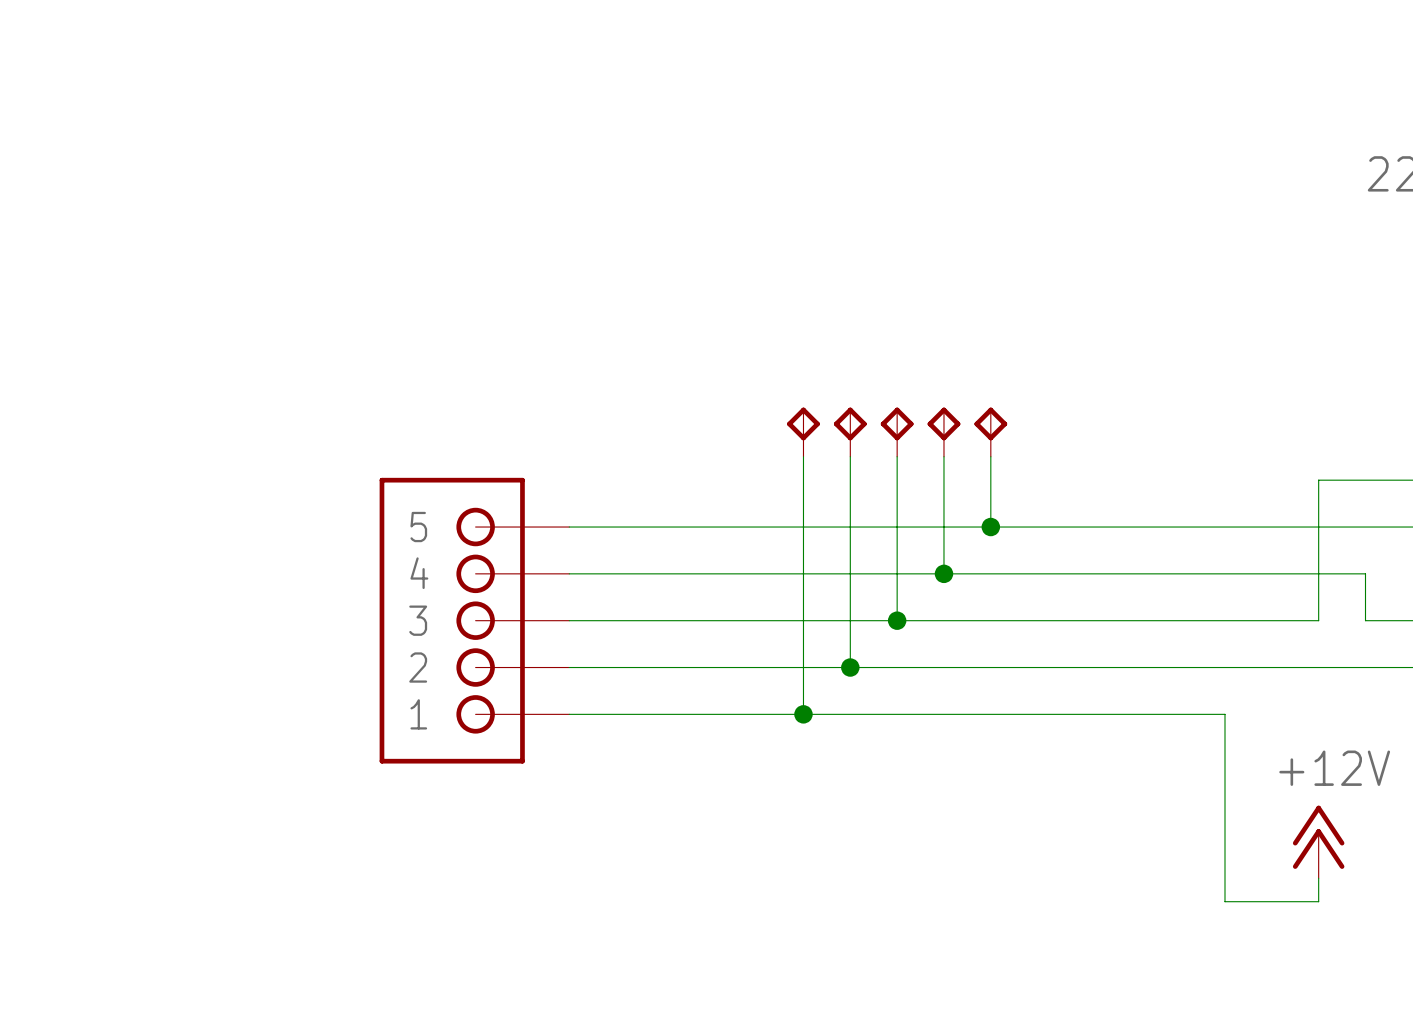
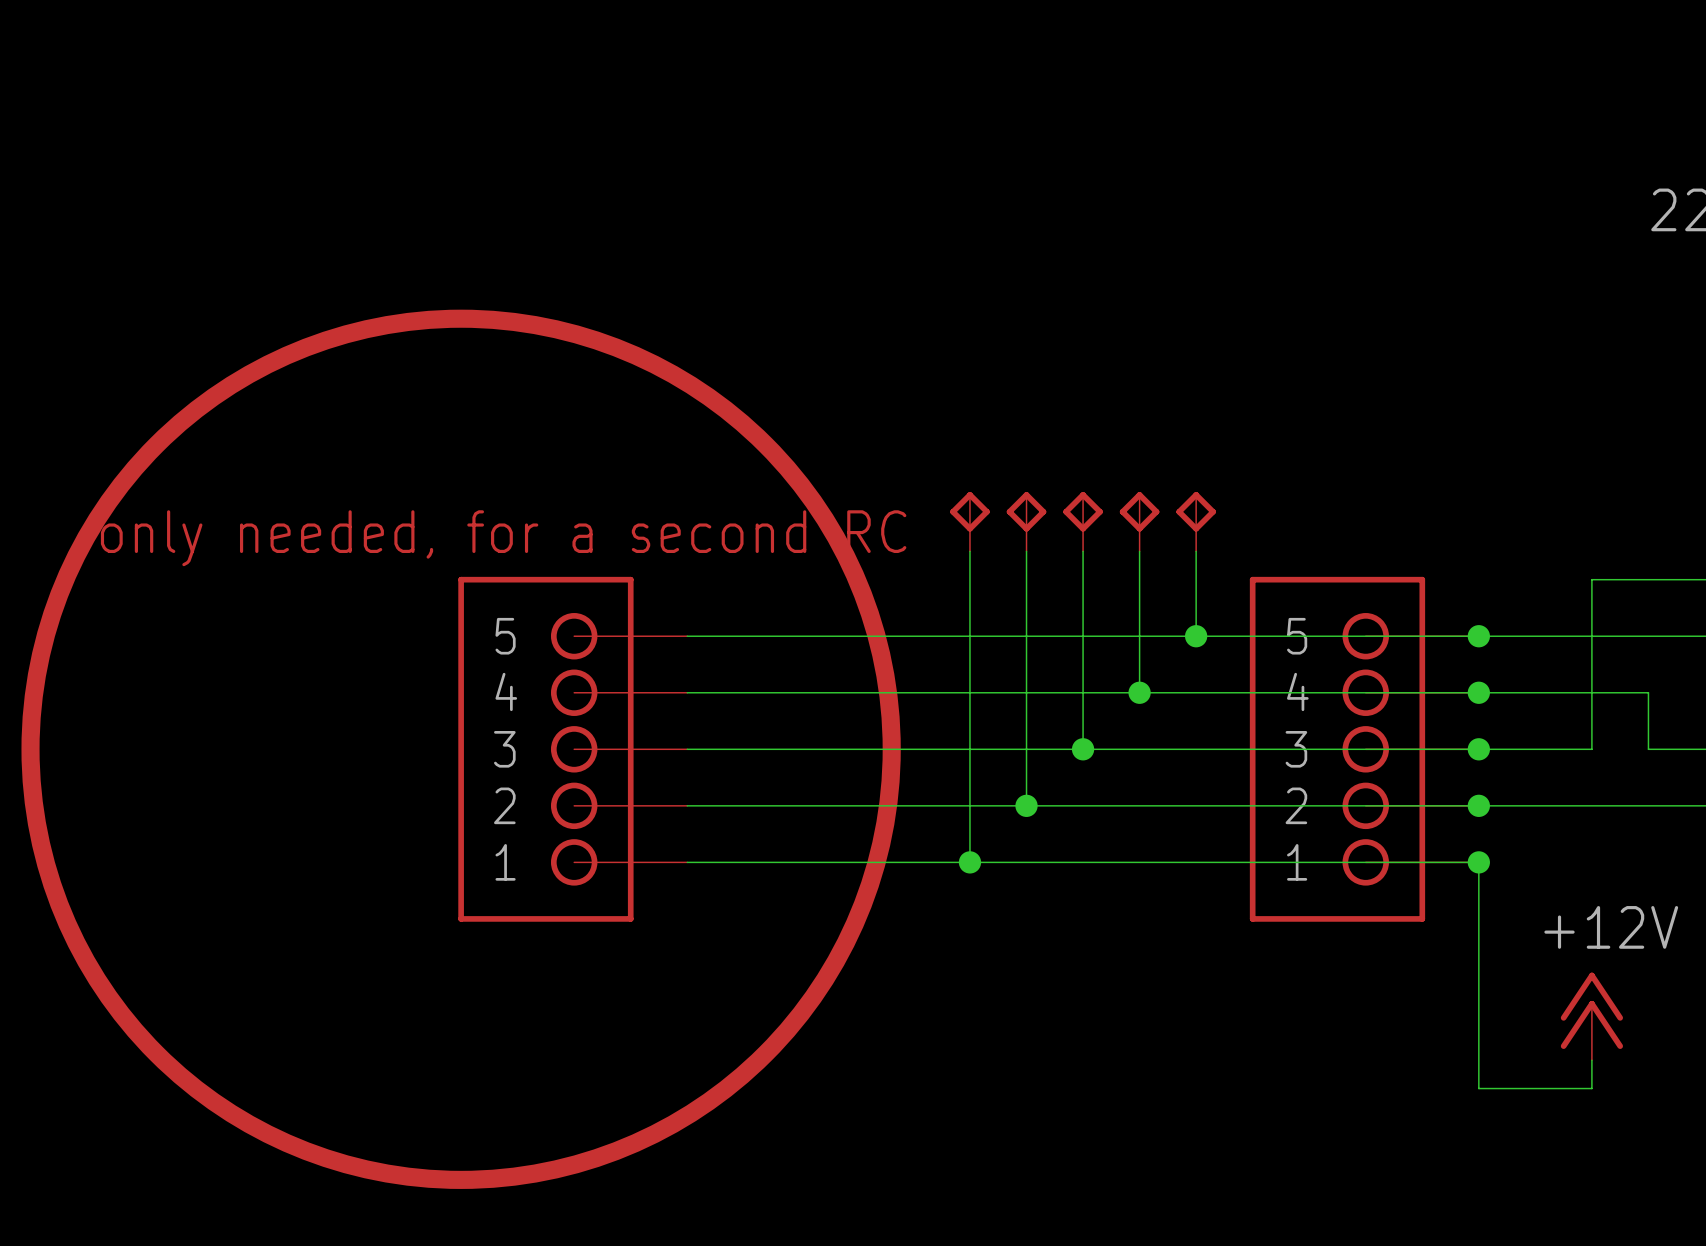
drawing: none -> [21, 309, 901, 1189]
text: none -> only needed, for a second RC (503, 538)
junction: none -> (1478, 636)
junction: none -> (1478, 692)
part: none -> (1364, 749)
junction: none -> (1478, 749)
junction: none -> (1478, 805)
junction: none -> (1478, 862)

